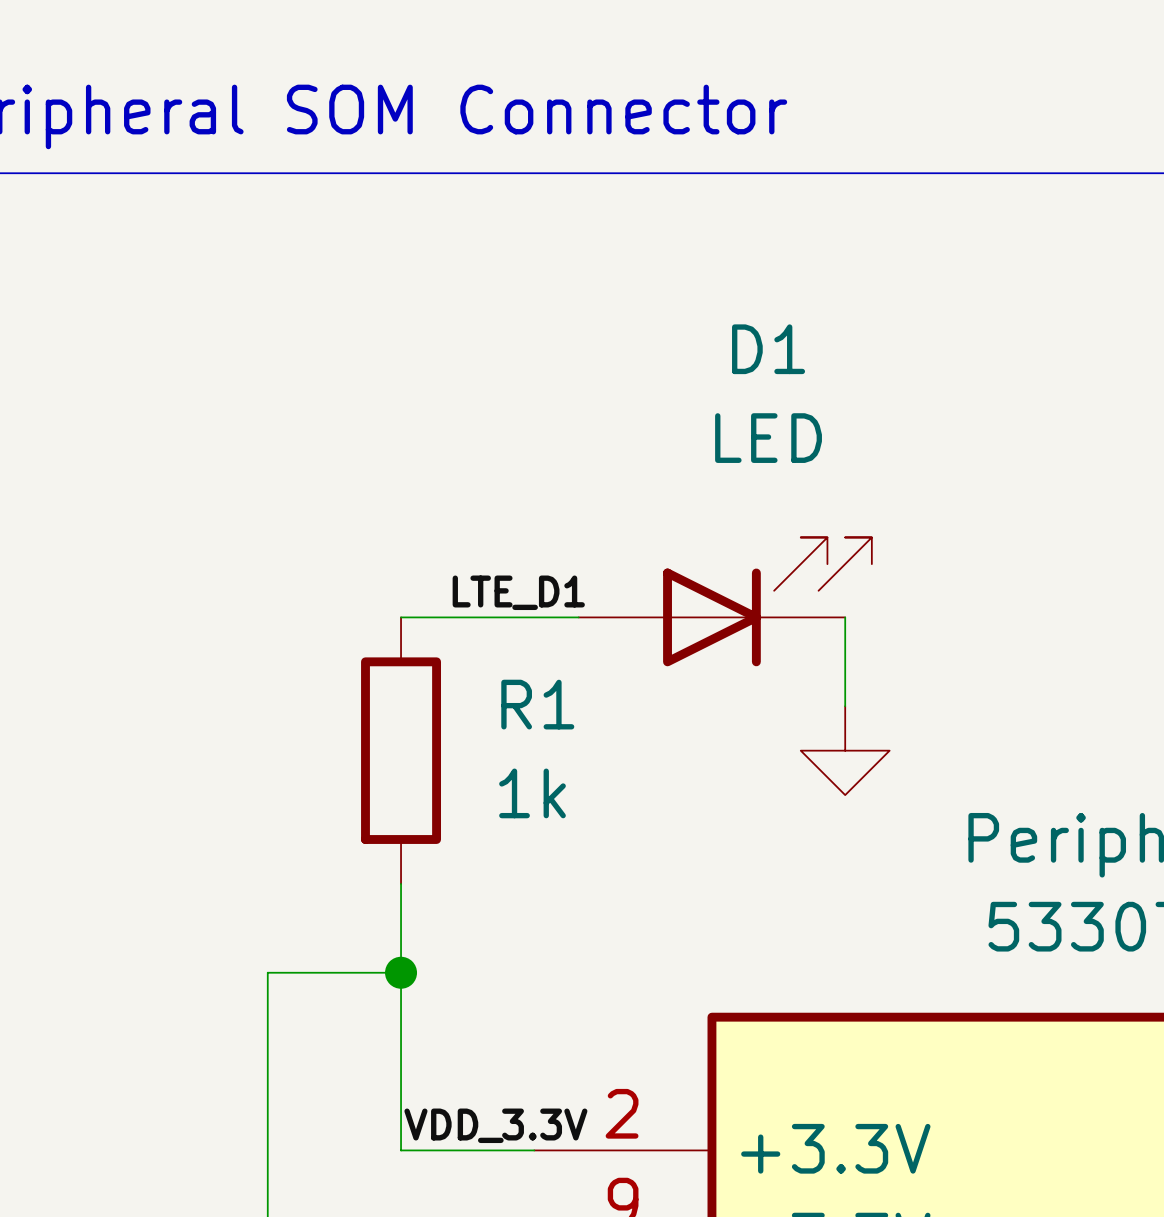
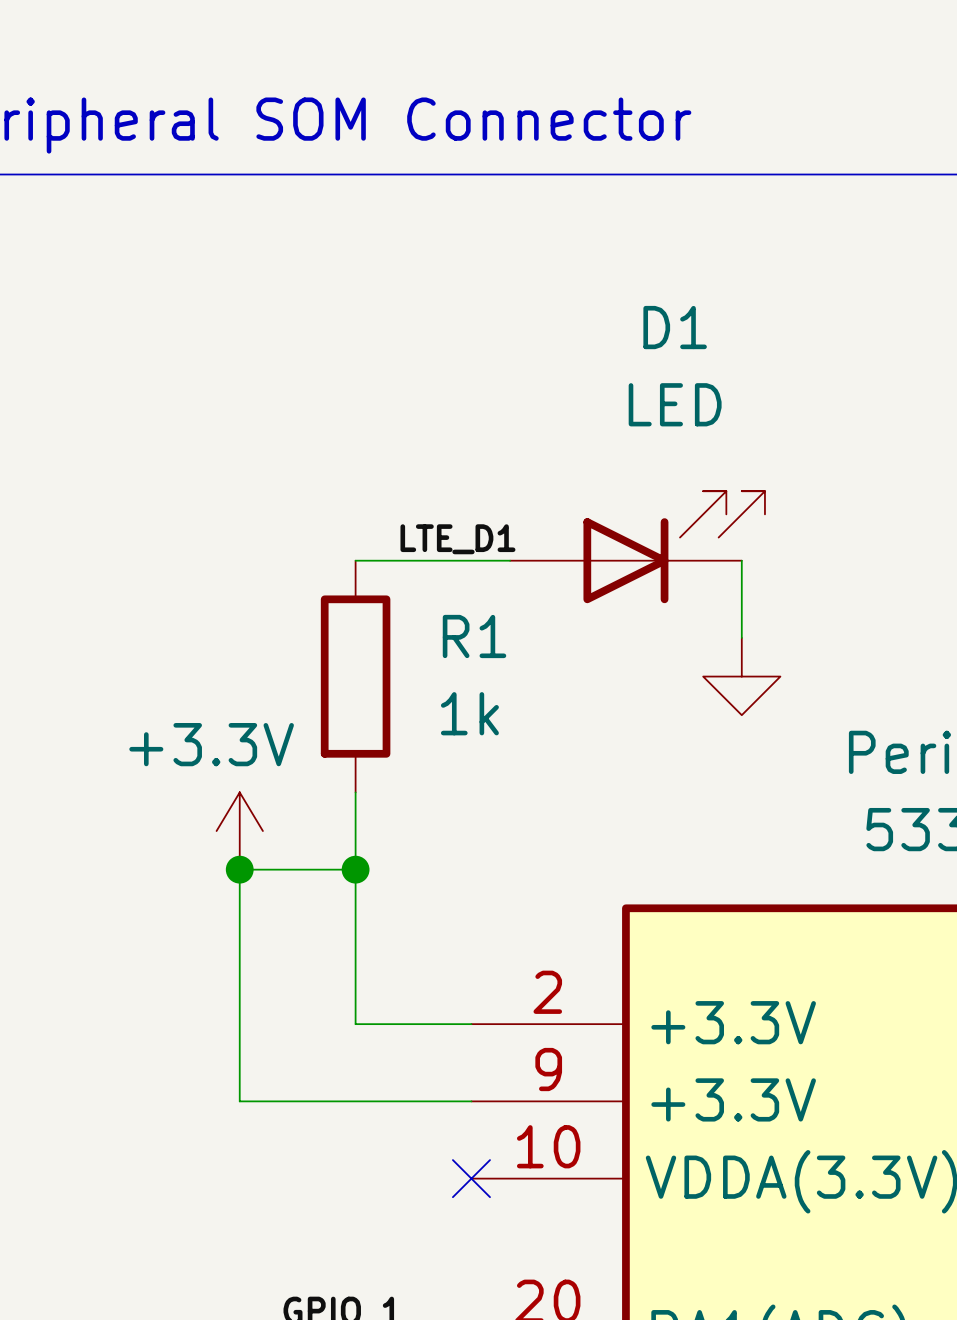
power symbol: none -> +3.3V (239, 831)
junction: none -> (239, 869)
label: VDD_3.3V (495, 1125) -> none

